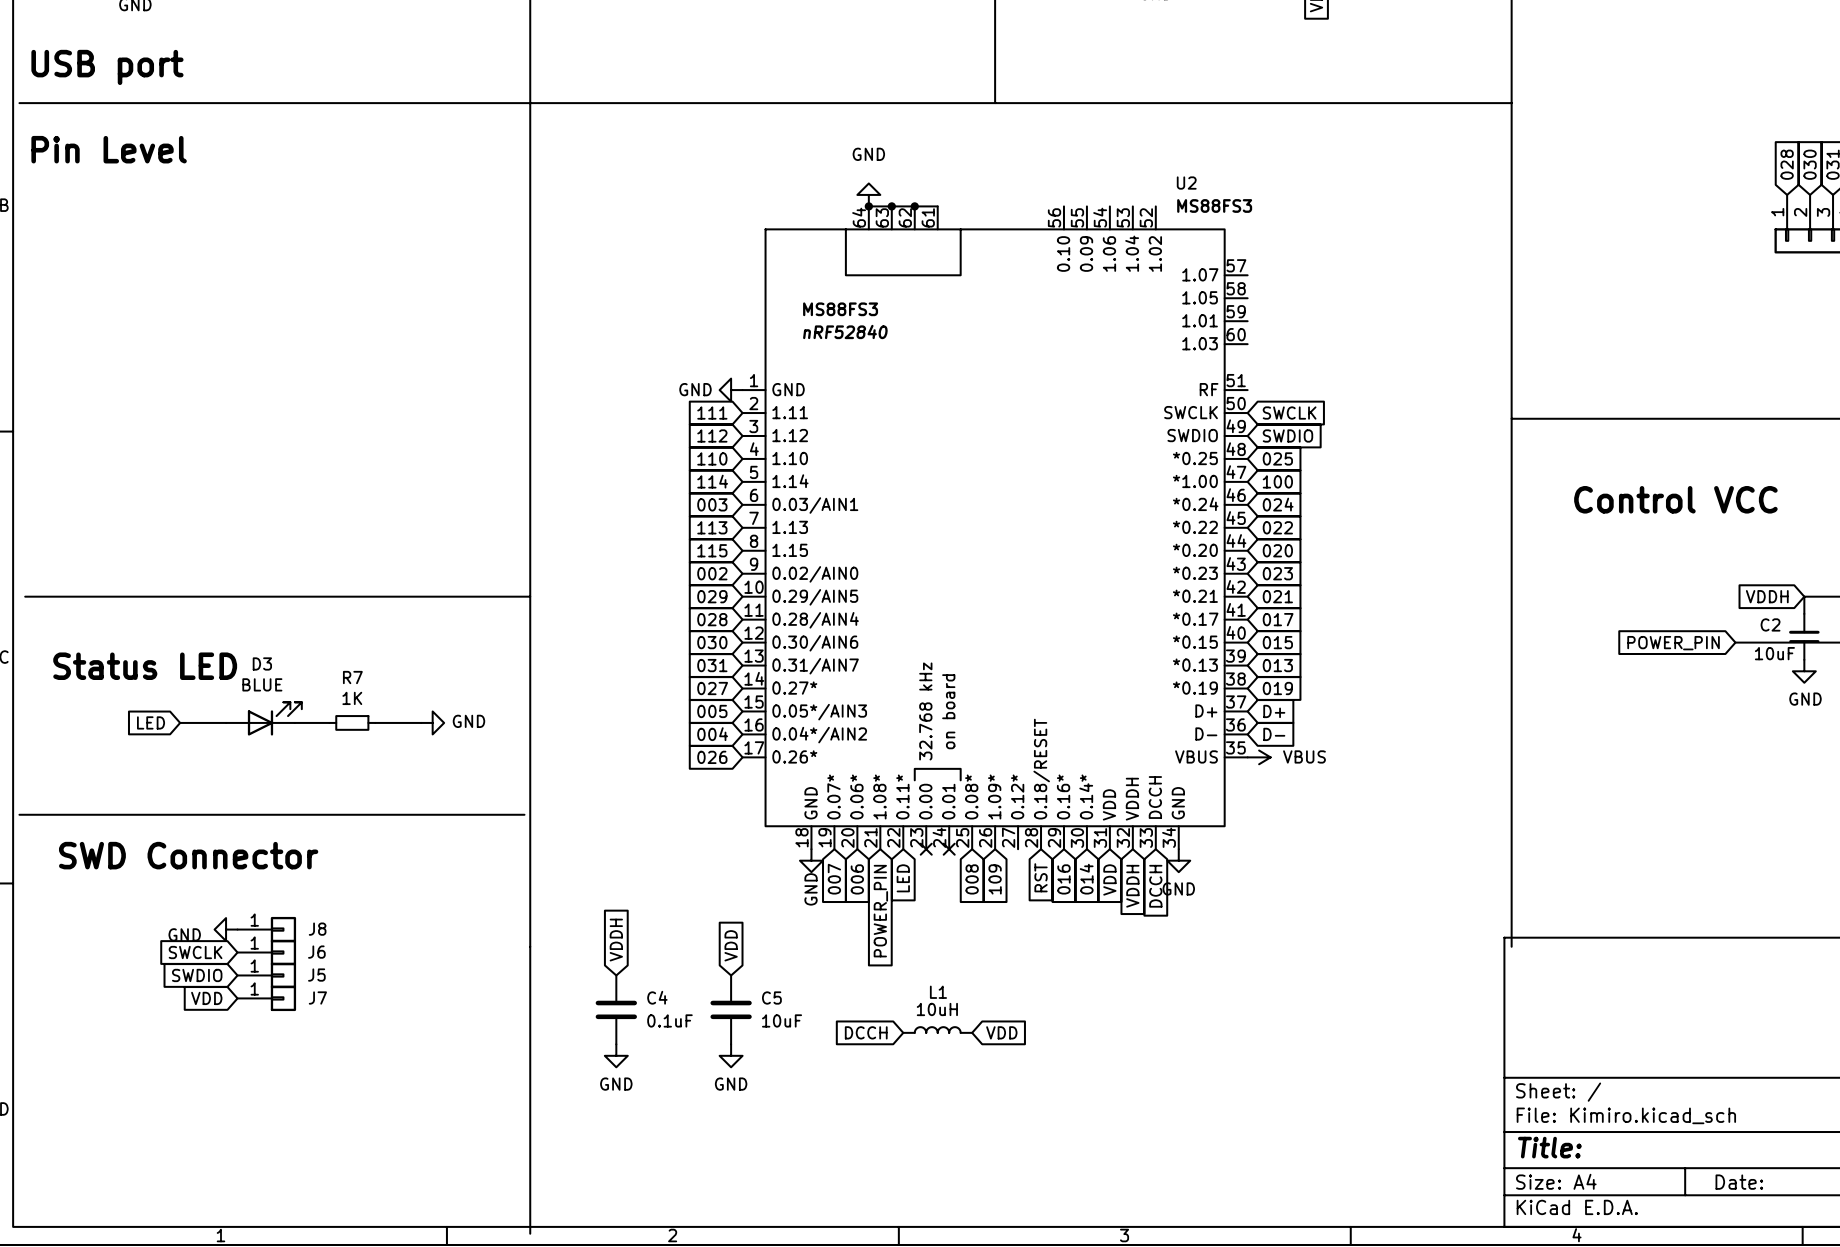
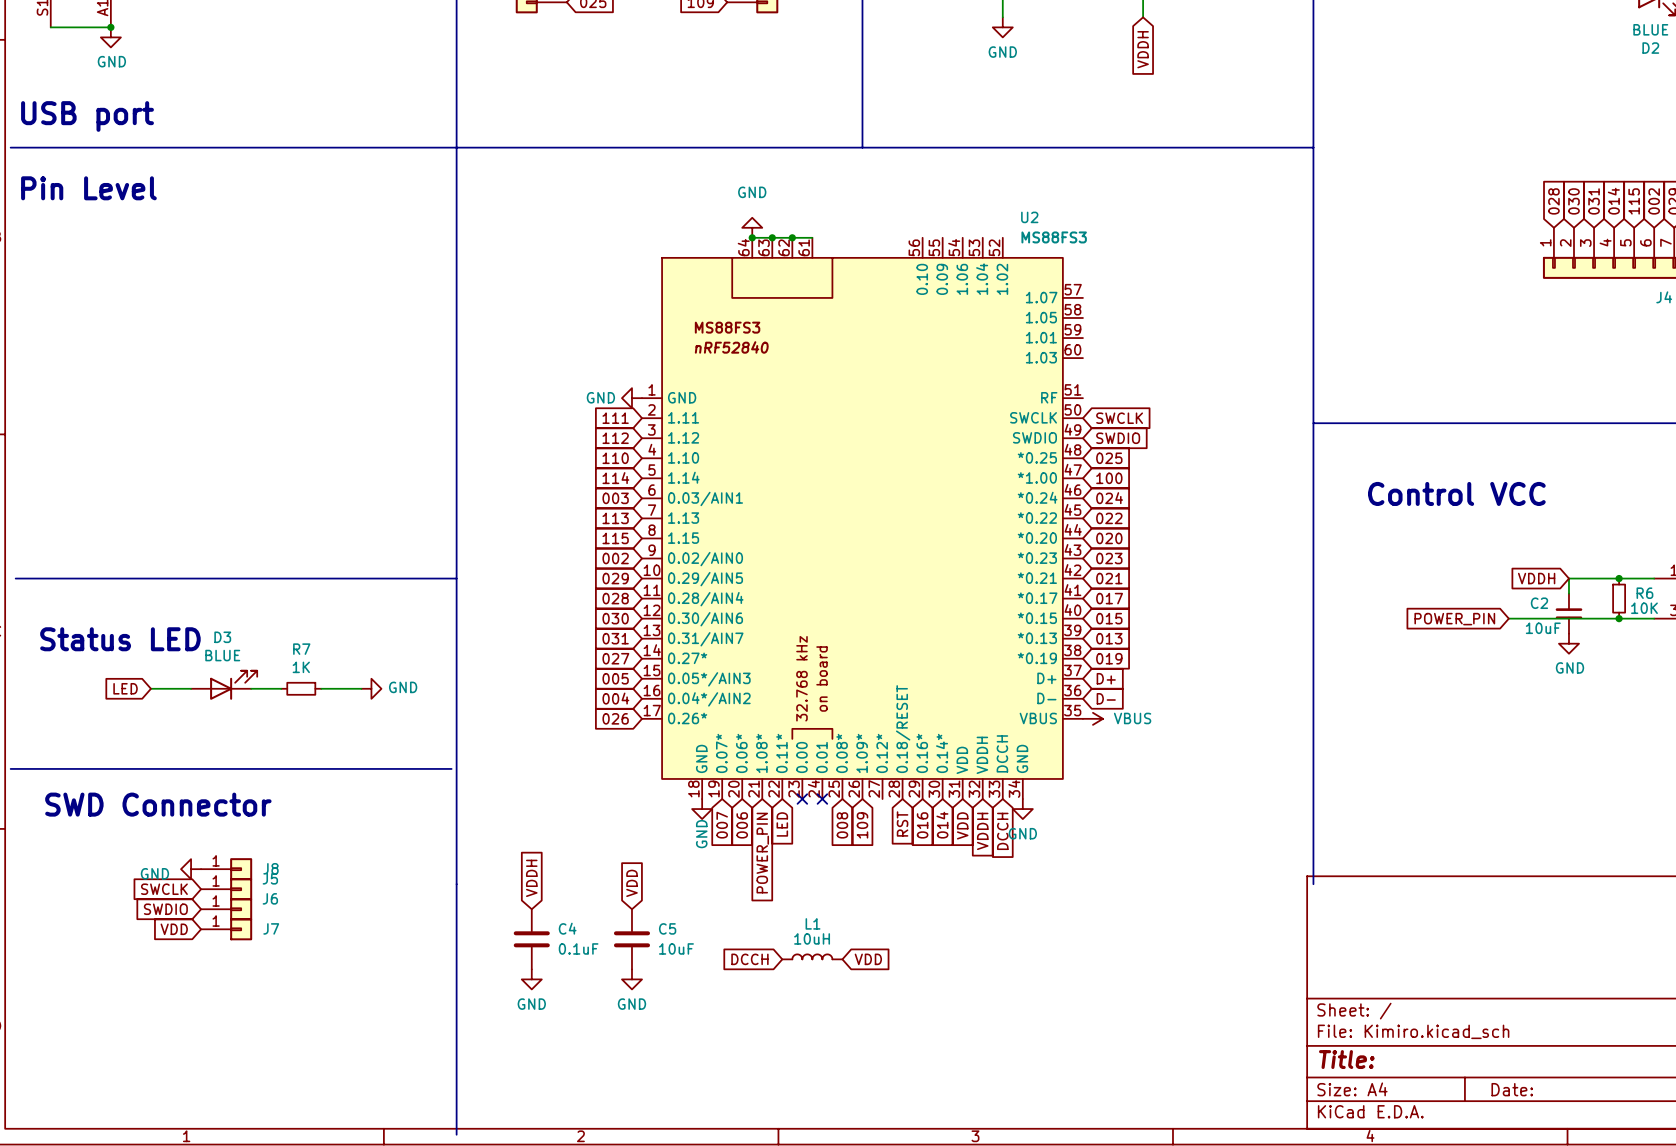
J6 name: J6 (316, 952) -> J5 (270, 878)
J5 name: J5 (316, 975) -> J6 (270, 898)

